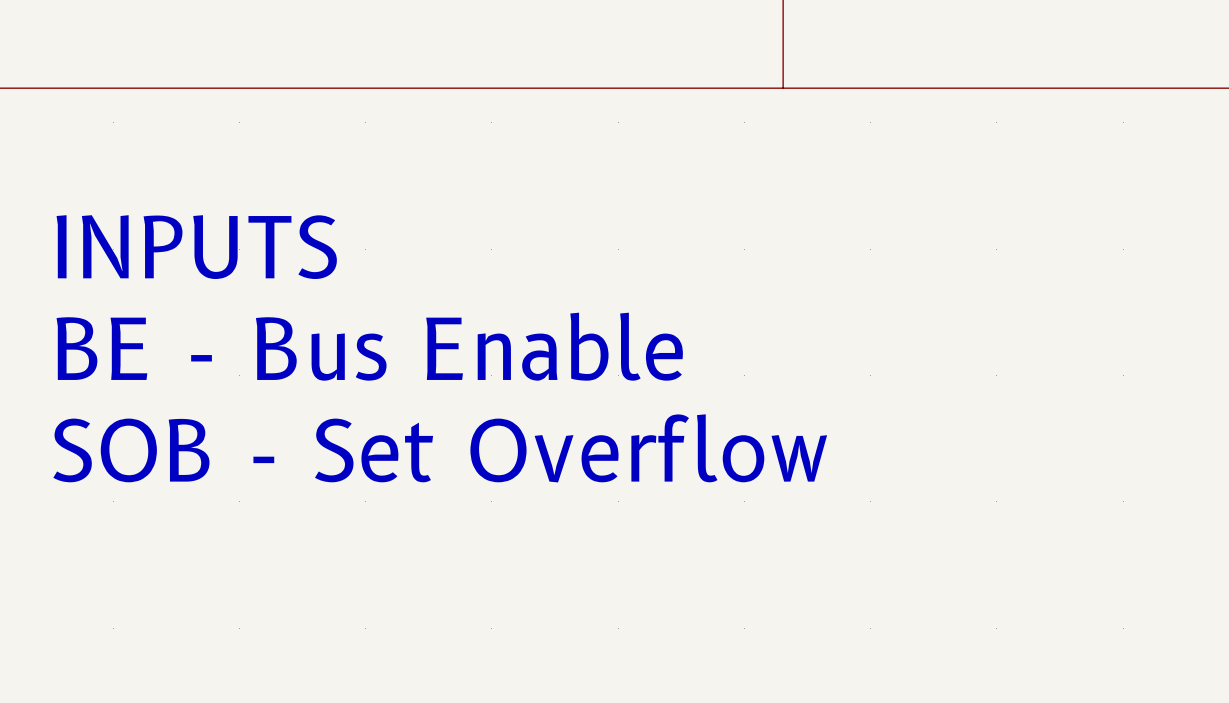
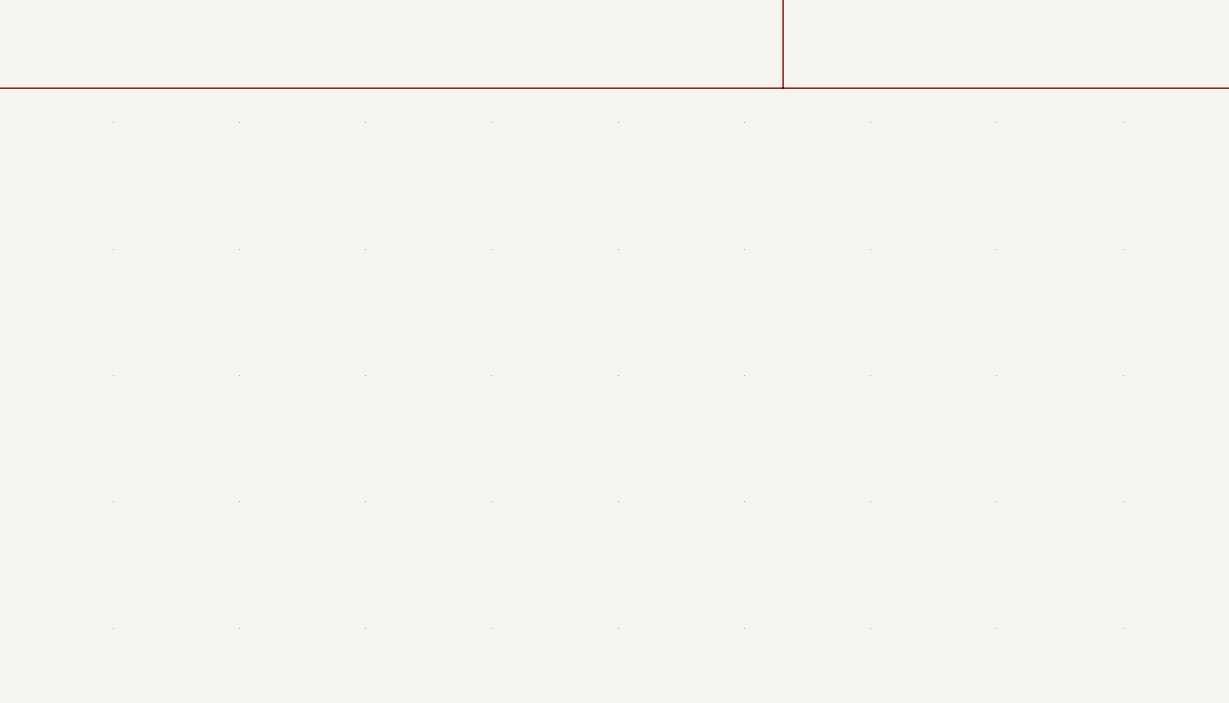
text: INPUTS (196, 247) -> none
text: BE - Bus Enable (369, 346) -> none
text: SOB - Set Overflow (440, 448) -> none

